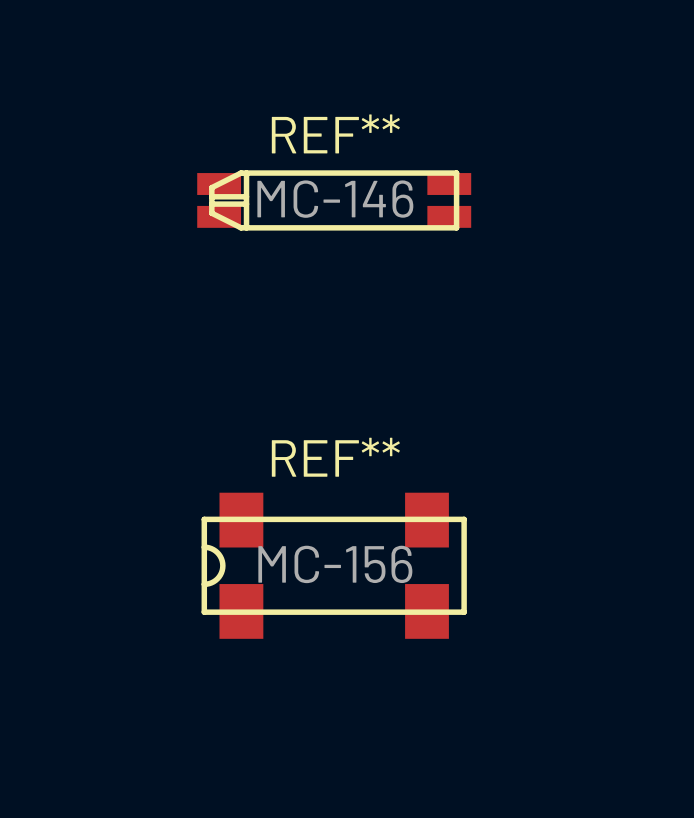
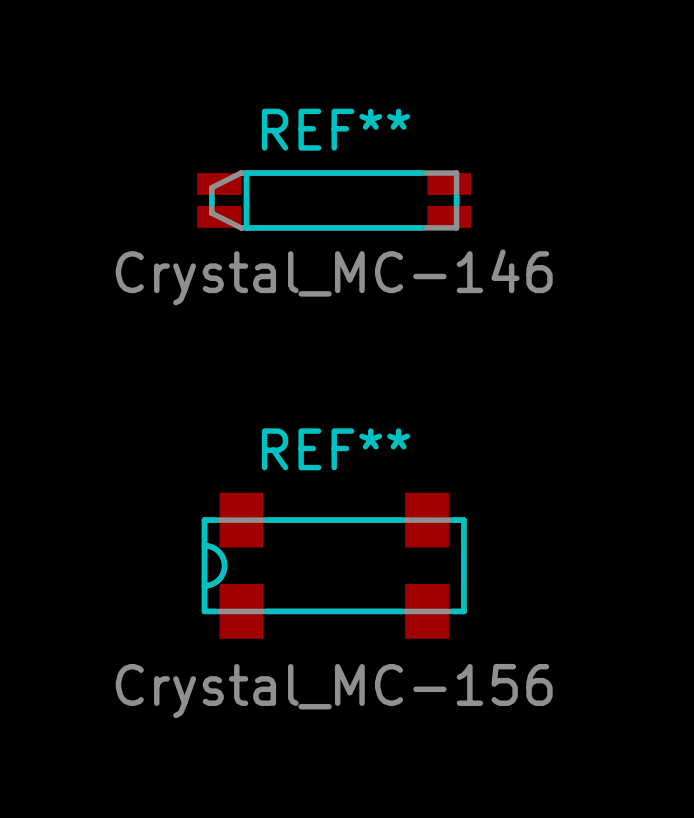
REF** footprint: [197, 170, 472, 231] -> [197, 170, 472, 231]
REF** value: MC-146 (335, 199) -> Crystal_MC-146 (334, 277)
REF** footprint: [201, 492, 467, 639] -> [201, 492, 467, 639]
REF** value: MC-156 (335, 564) -> Crystal_MC-156 (334, 691)

